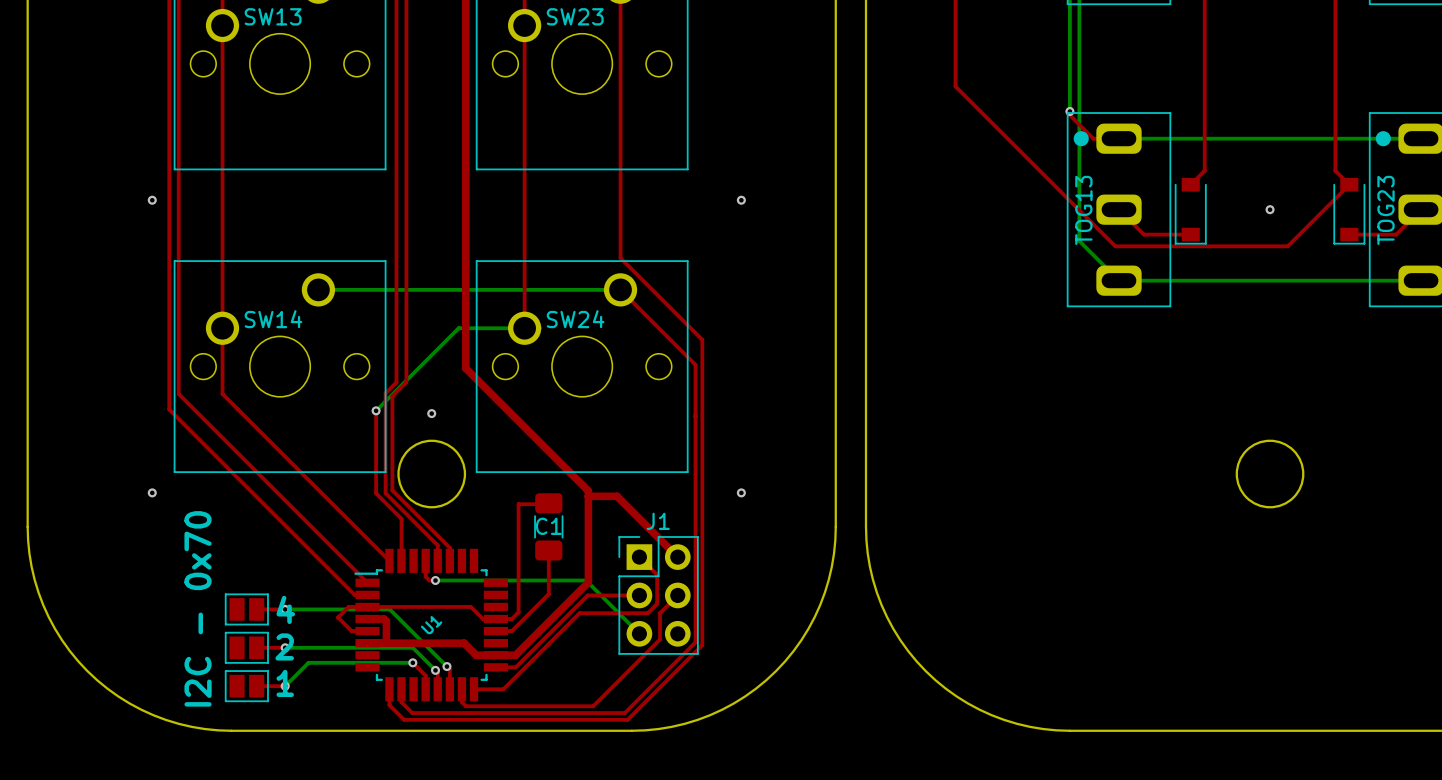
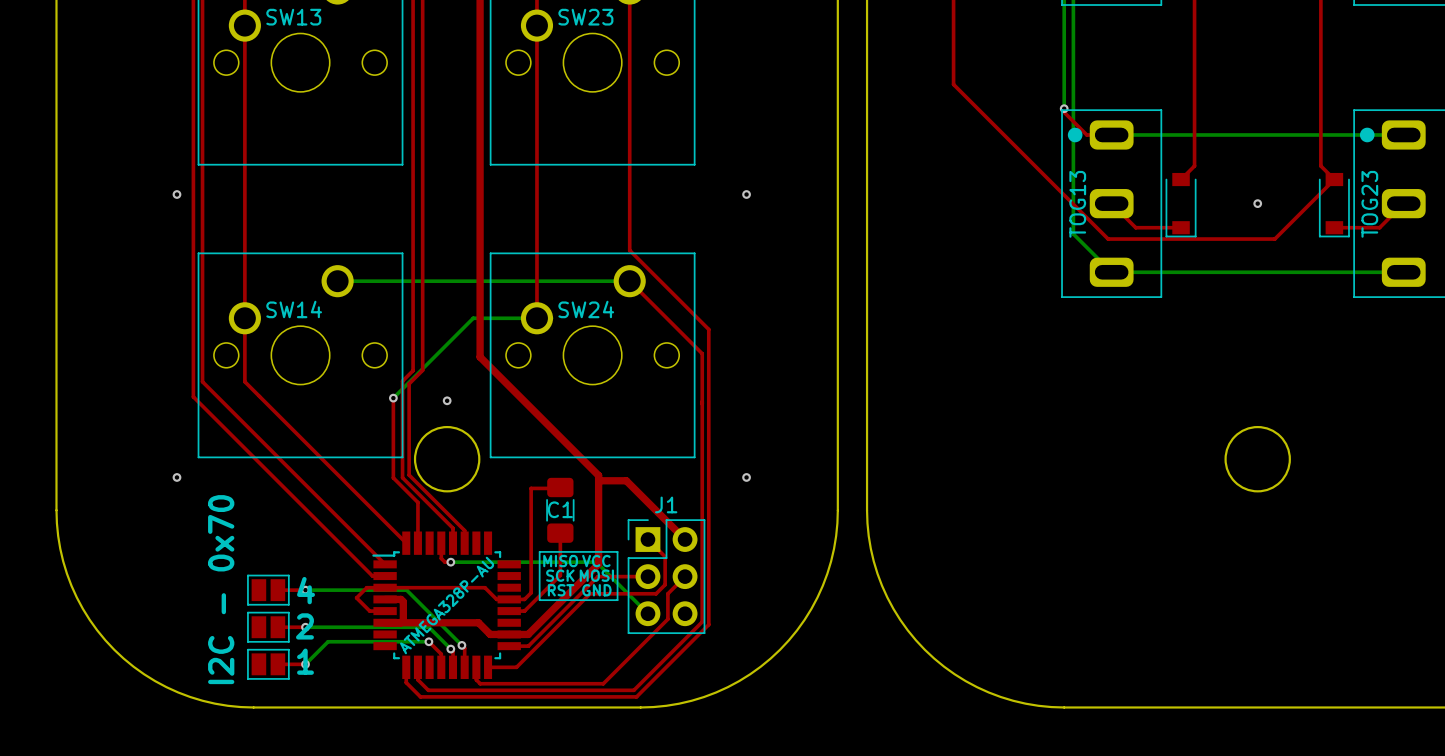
drawing: none -> [538, 551, 619, 602]
U1 name: U1 (431, 625) -> ATMEGA328P-AU (447, 605)

